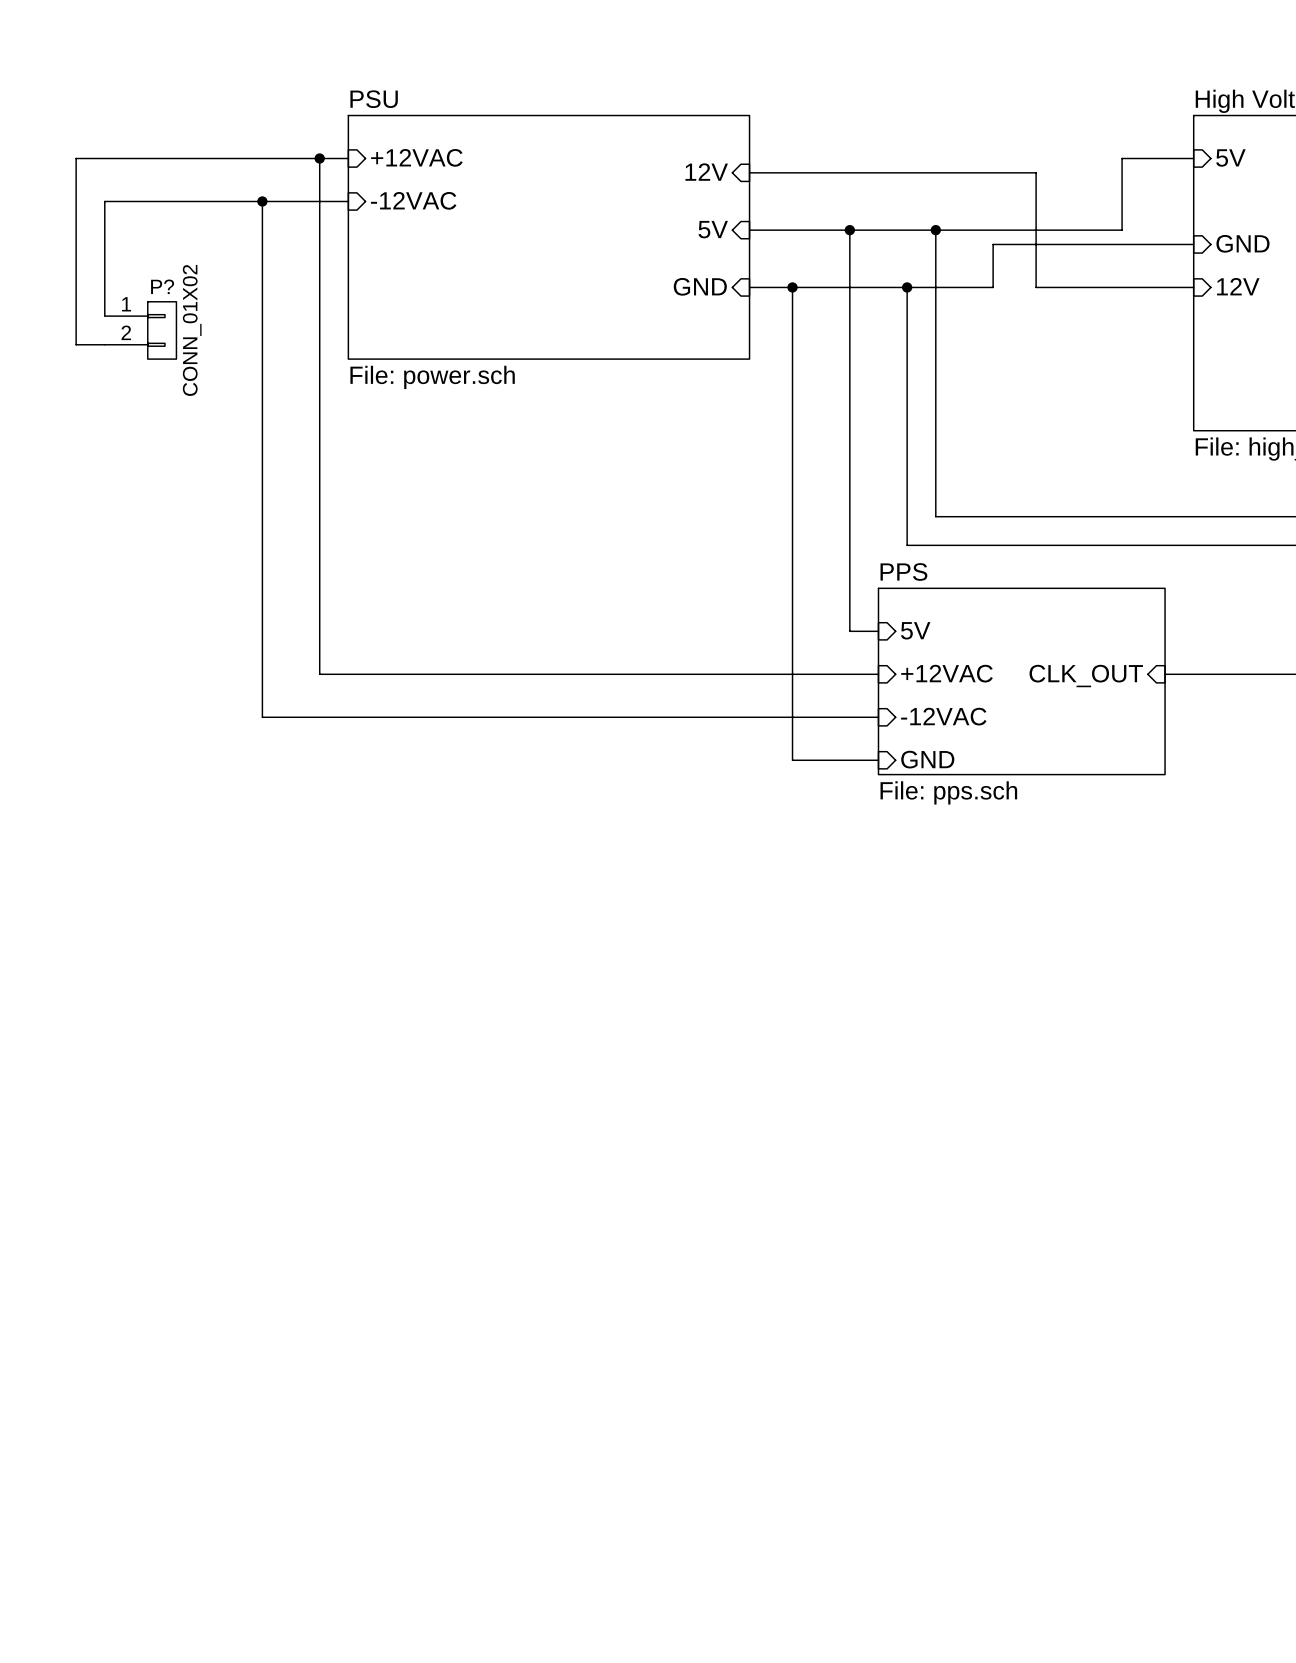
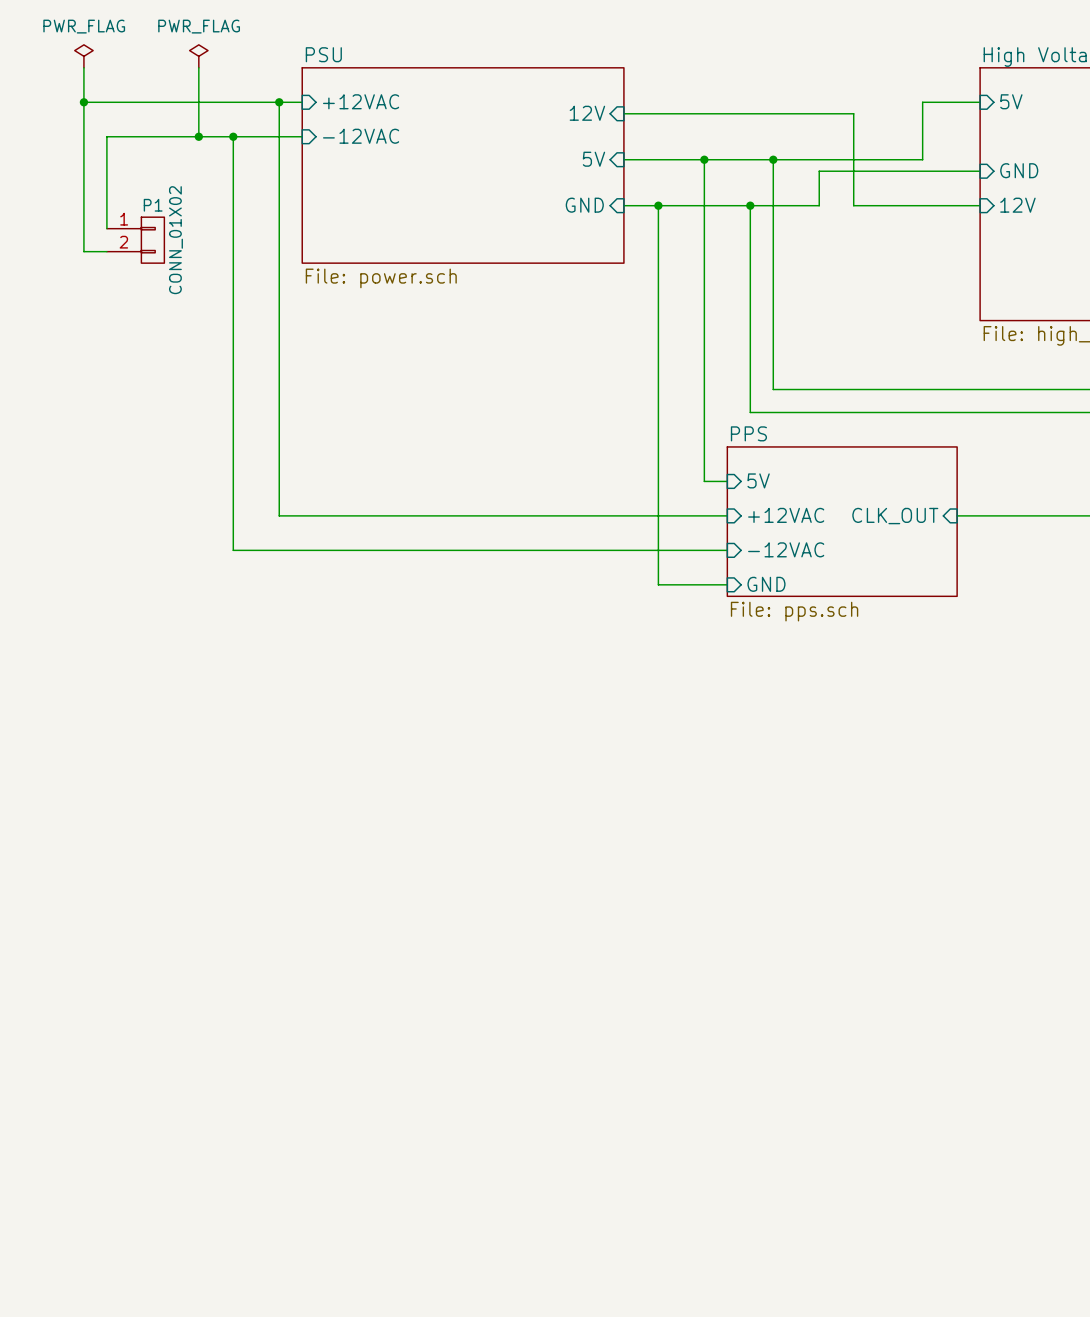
power symbol: none -> PWR_FLAG (83, 56)
power symbol: none -> PWR_FLAG (198, 56)
wire: none -> (83, 67) (83, 102)
wire: none -> (198, 67) (198, 136)
junction: none -> (83, 102)
junction: none -> (198, 136)
P? name: P? (162, 286) -> P1 (153, 205)

